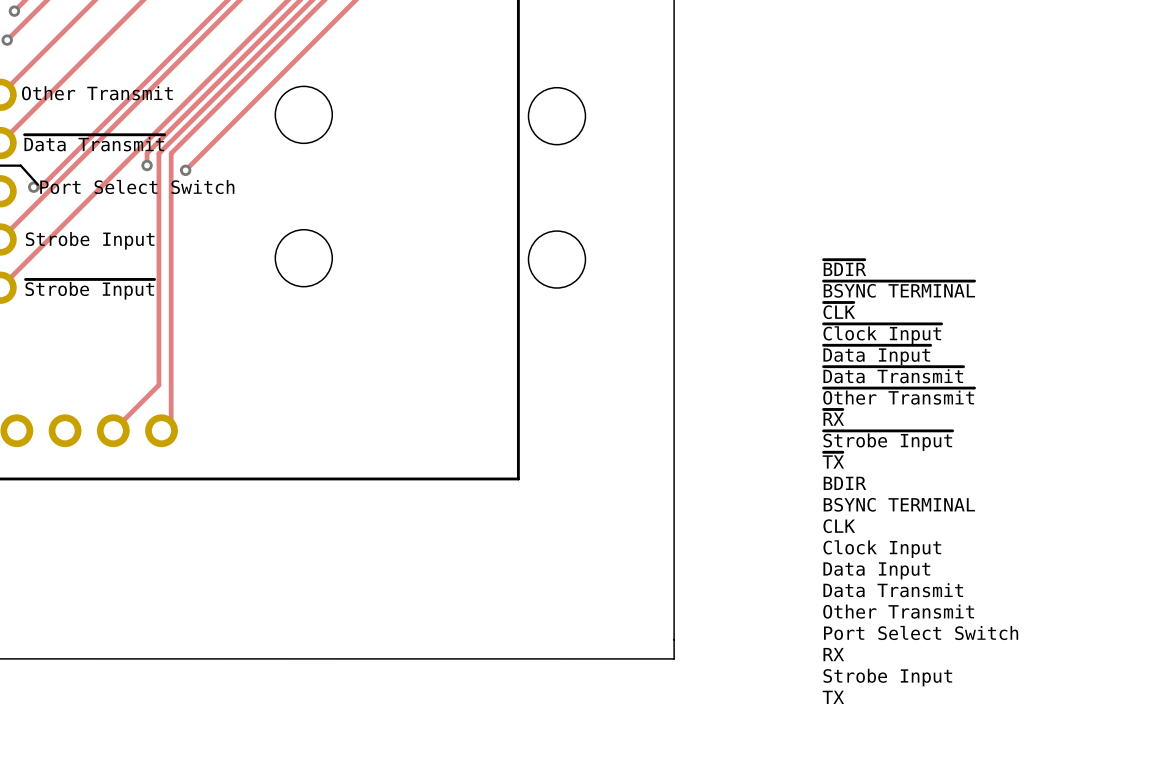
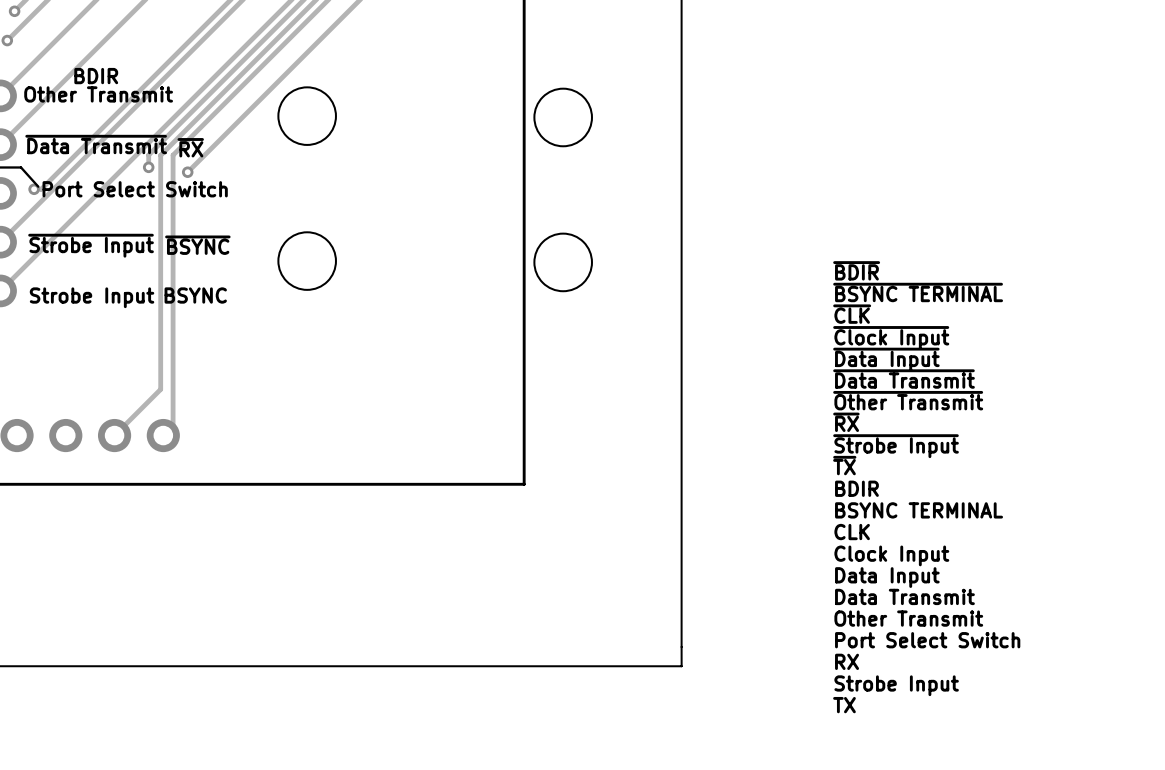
text: none -> BDIR (96, 76)
text: none -> ~{RX} (190, 147)
text: Strobe Input (90, 240) -> ~{Strobe Input} (91, 245)
text: none -> ~{BSYNC} (197, 245)
text: ~{Strobe Input} (90, 289) -> Strobe Input (92, 297)
text: none -> BSYNC (195, 295)

